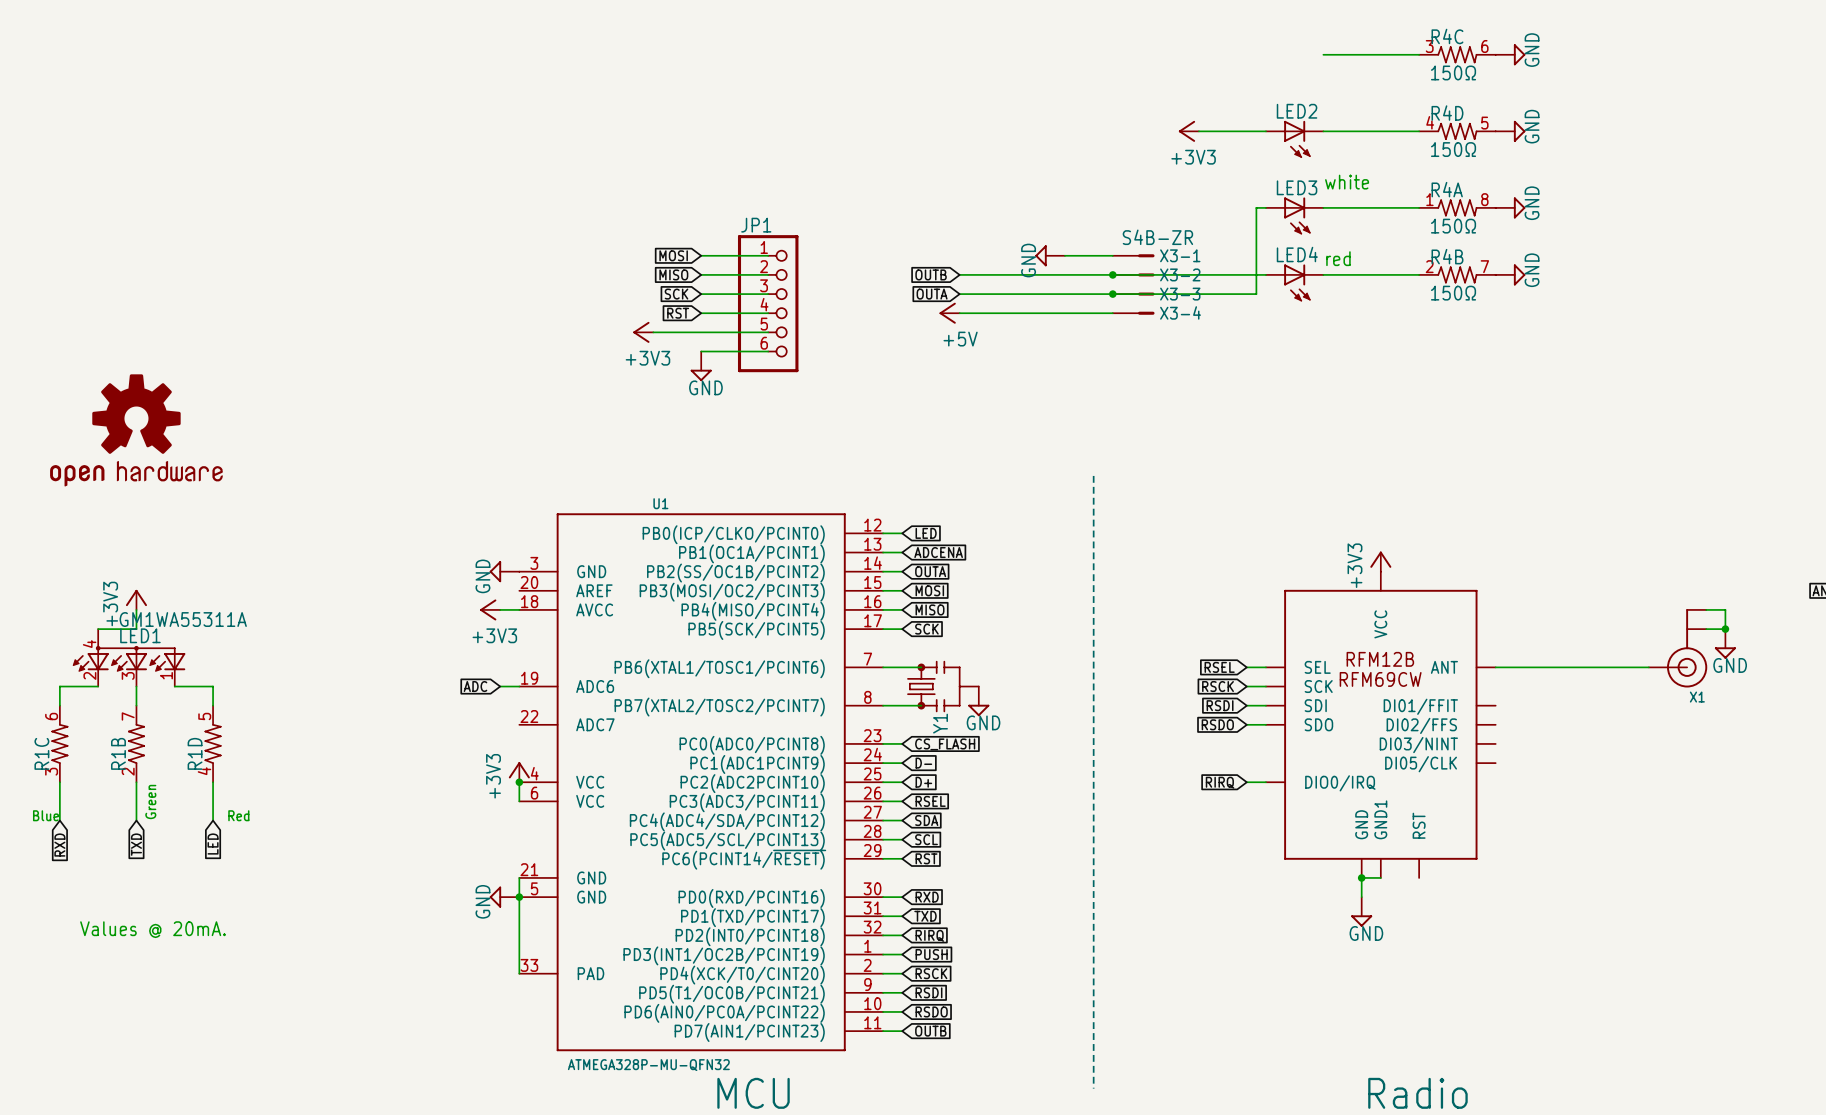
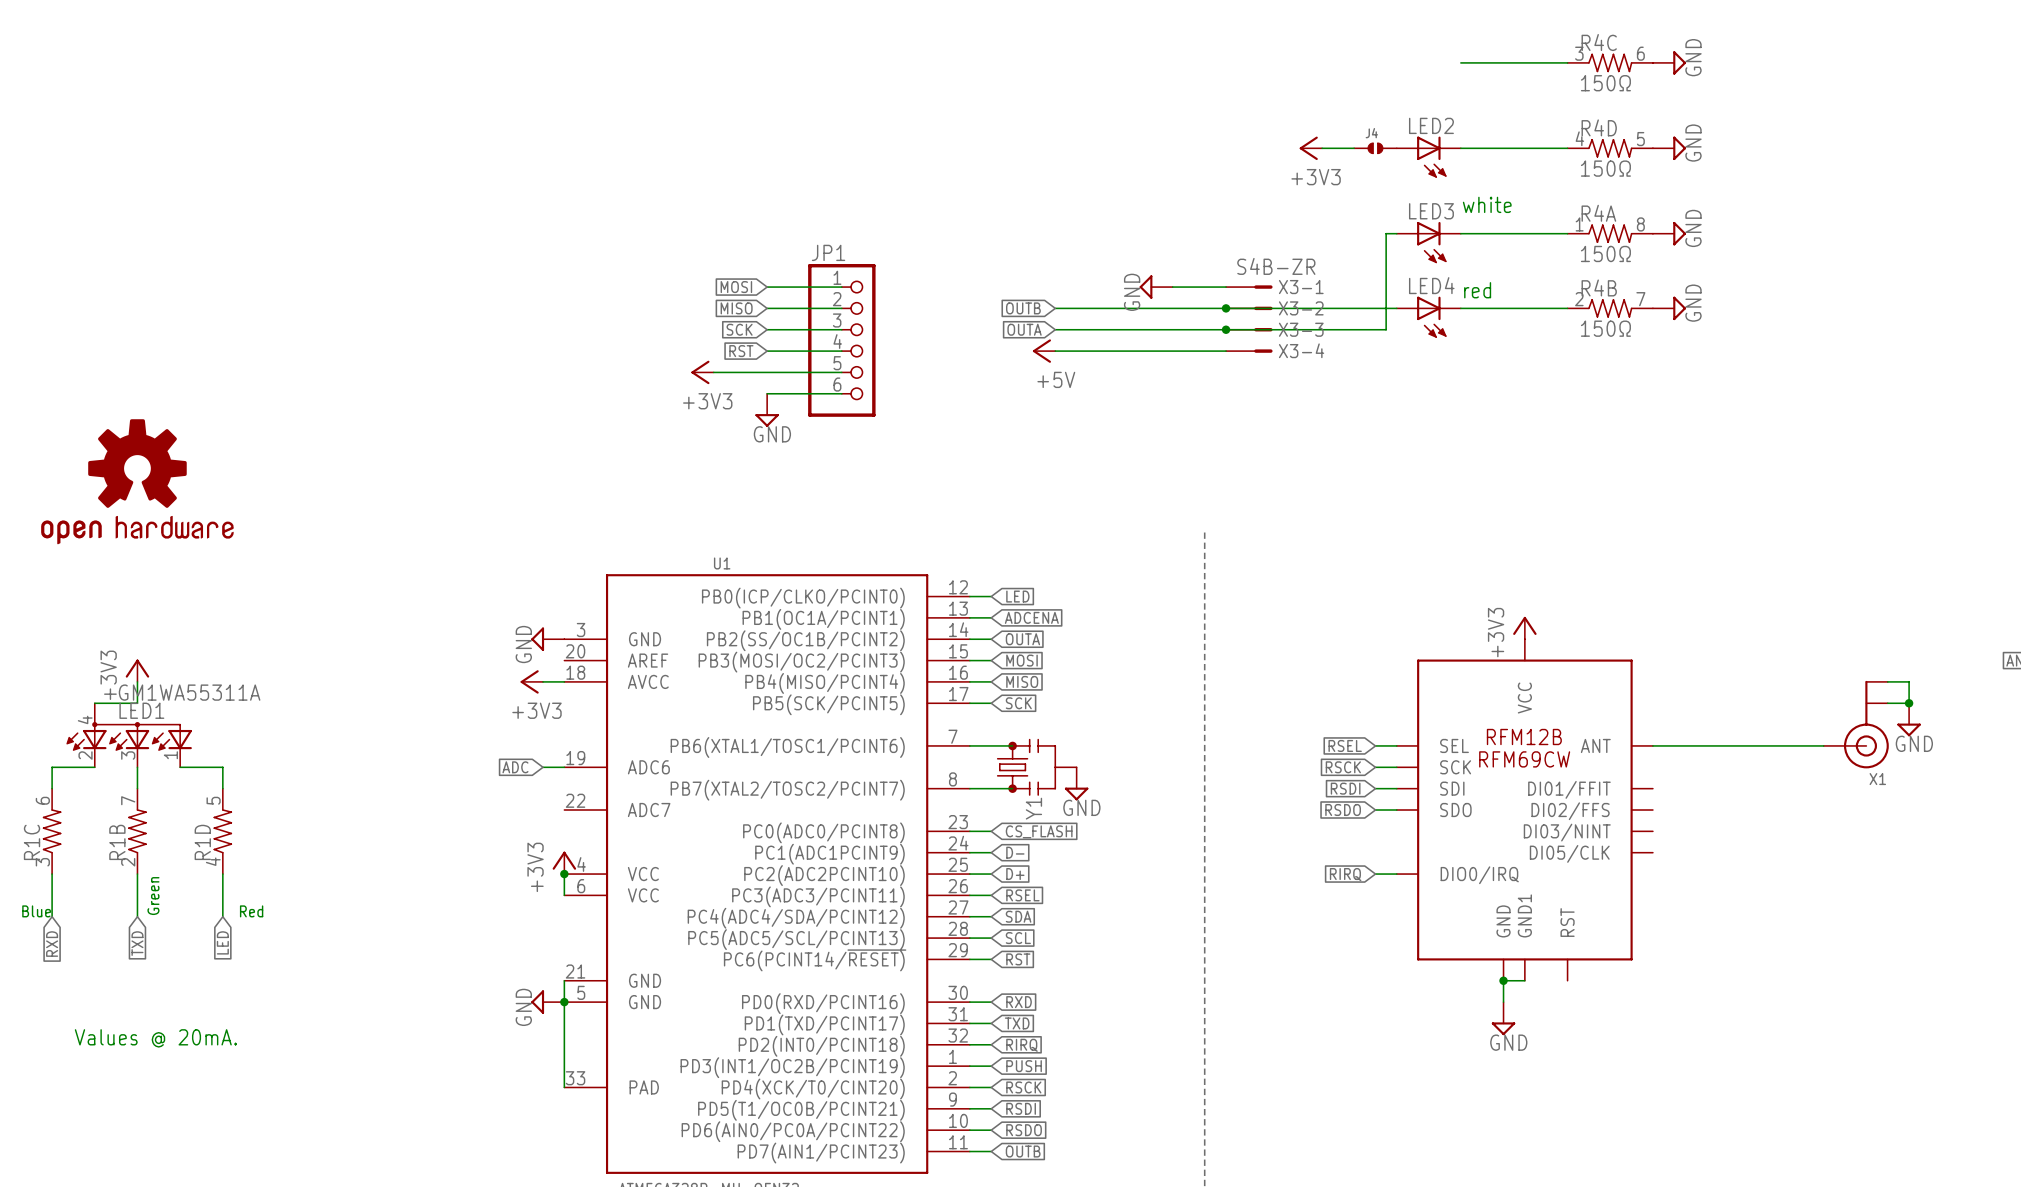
J4: none -> (1375, 148)

